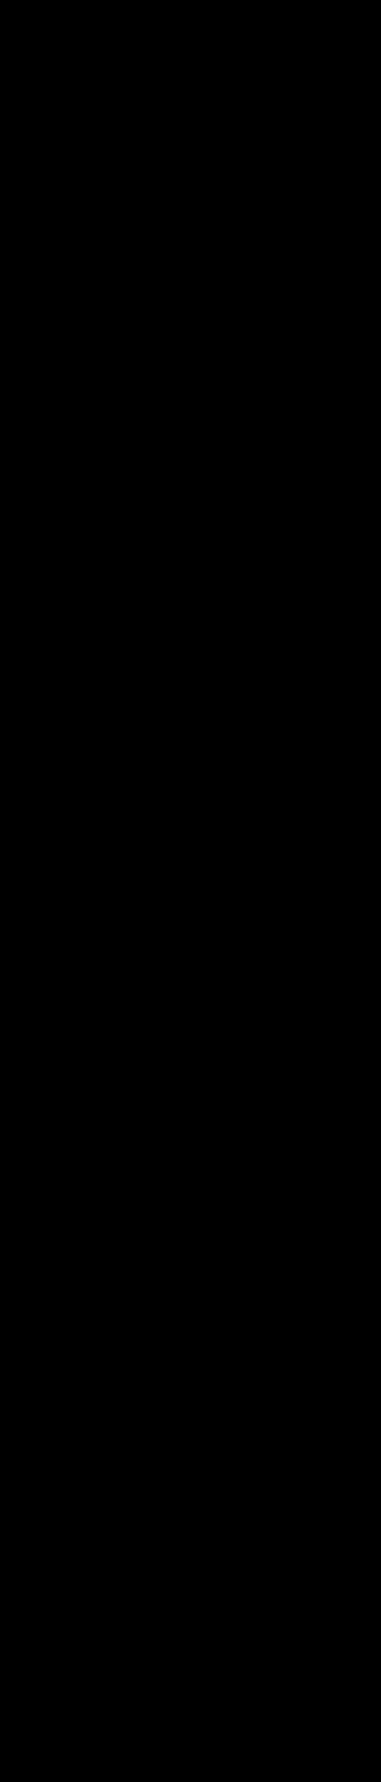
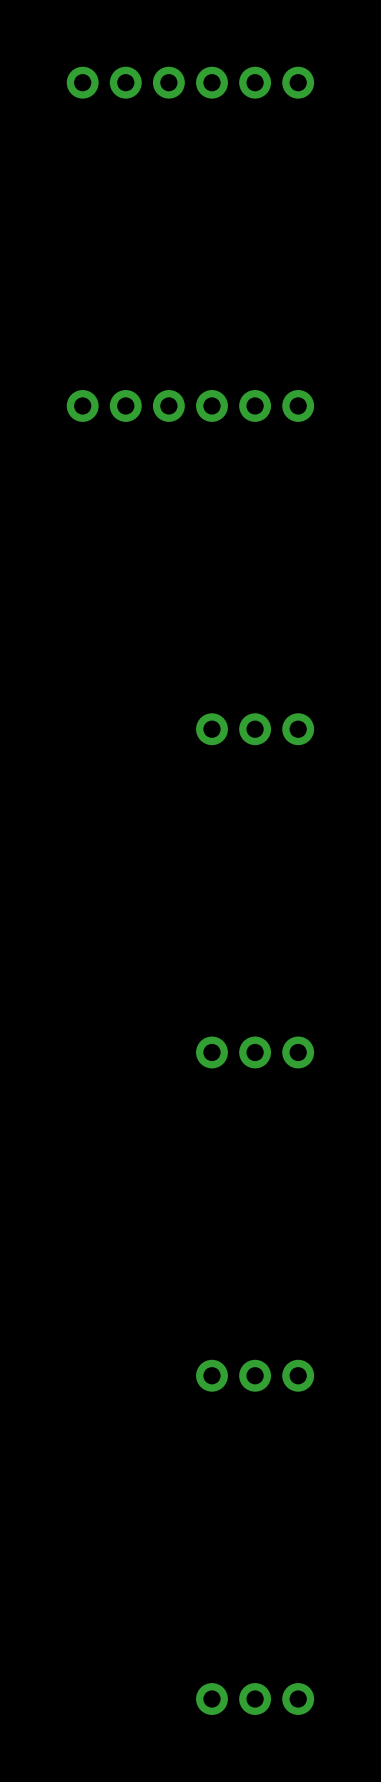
part: none -> (190, 82)
part: none -> (190, 405)
part: none -> (255, 729)
part: none -> (255, 1052)
part: none -> (255, 1375)
part: none -> (255, 1699)

